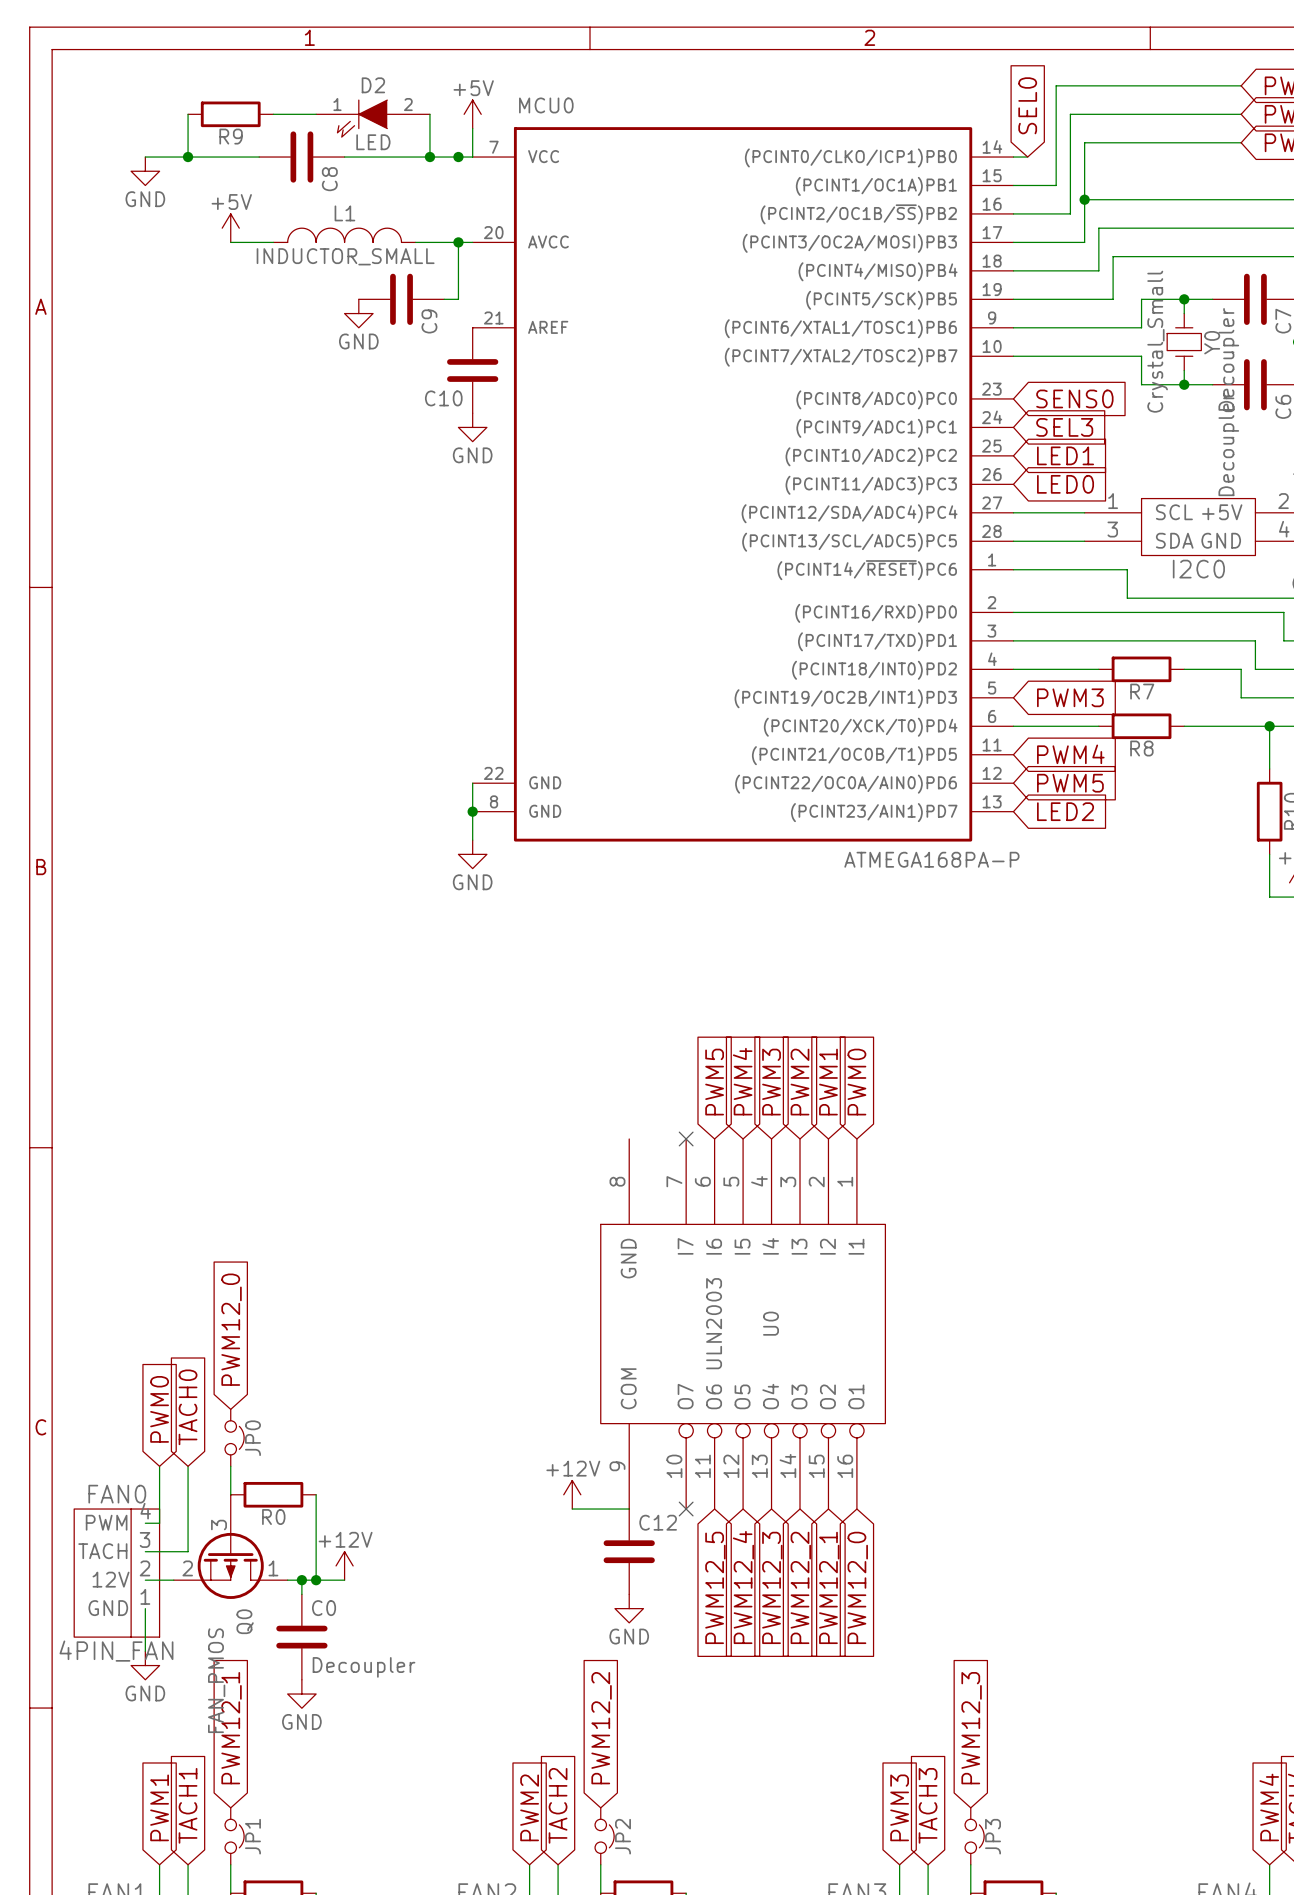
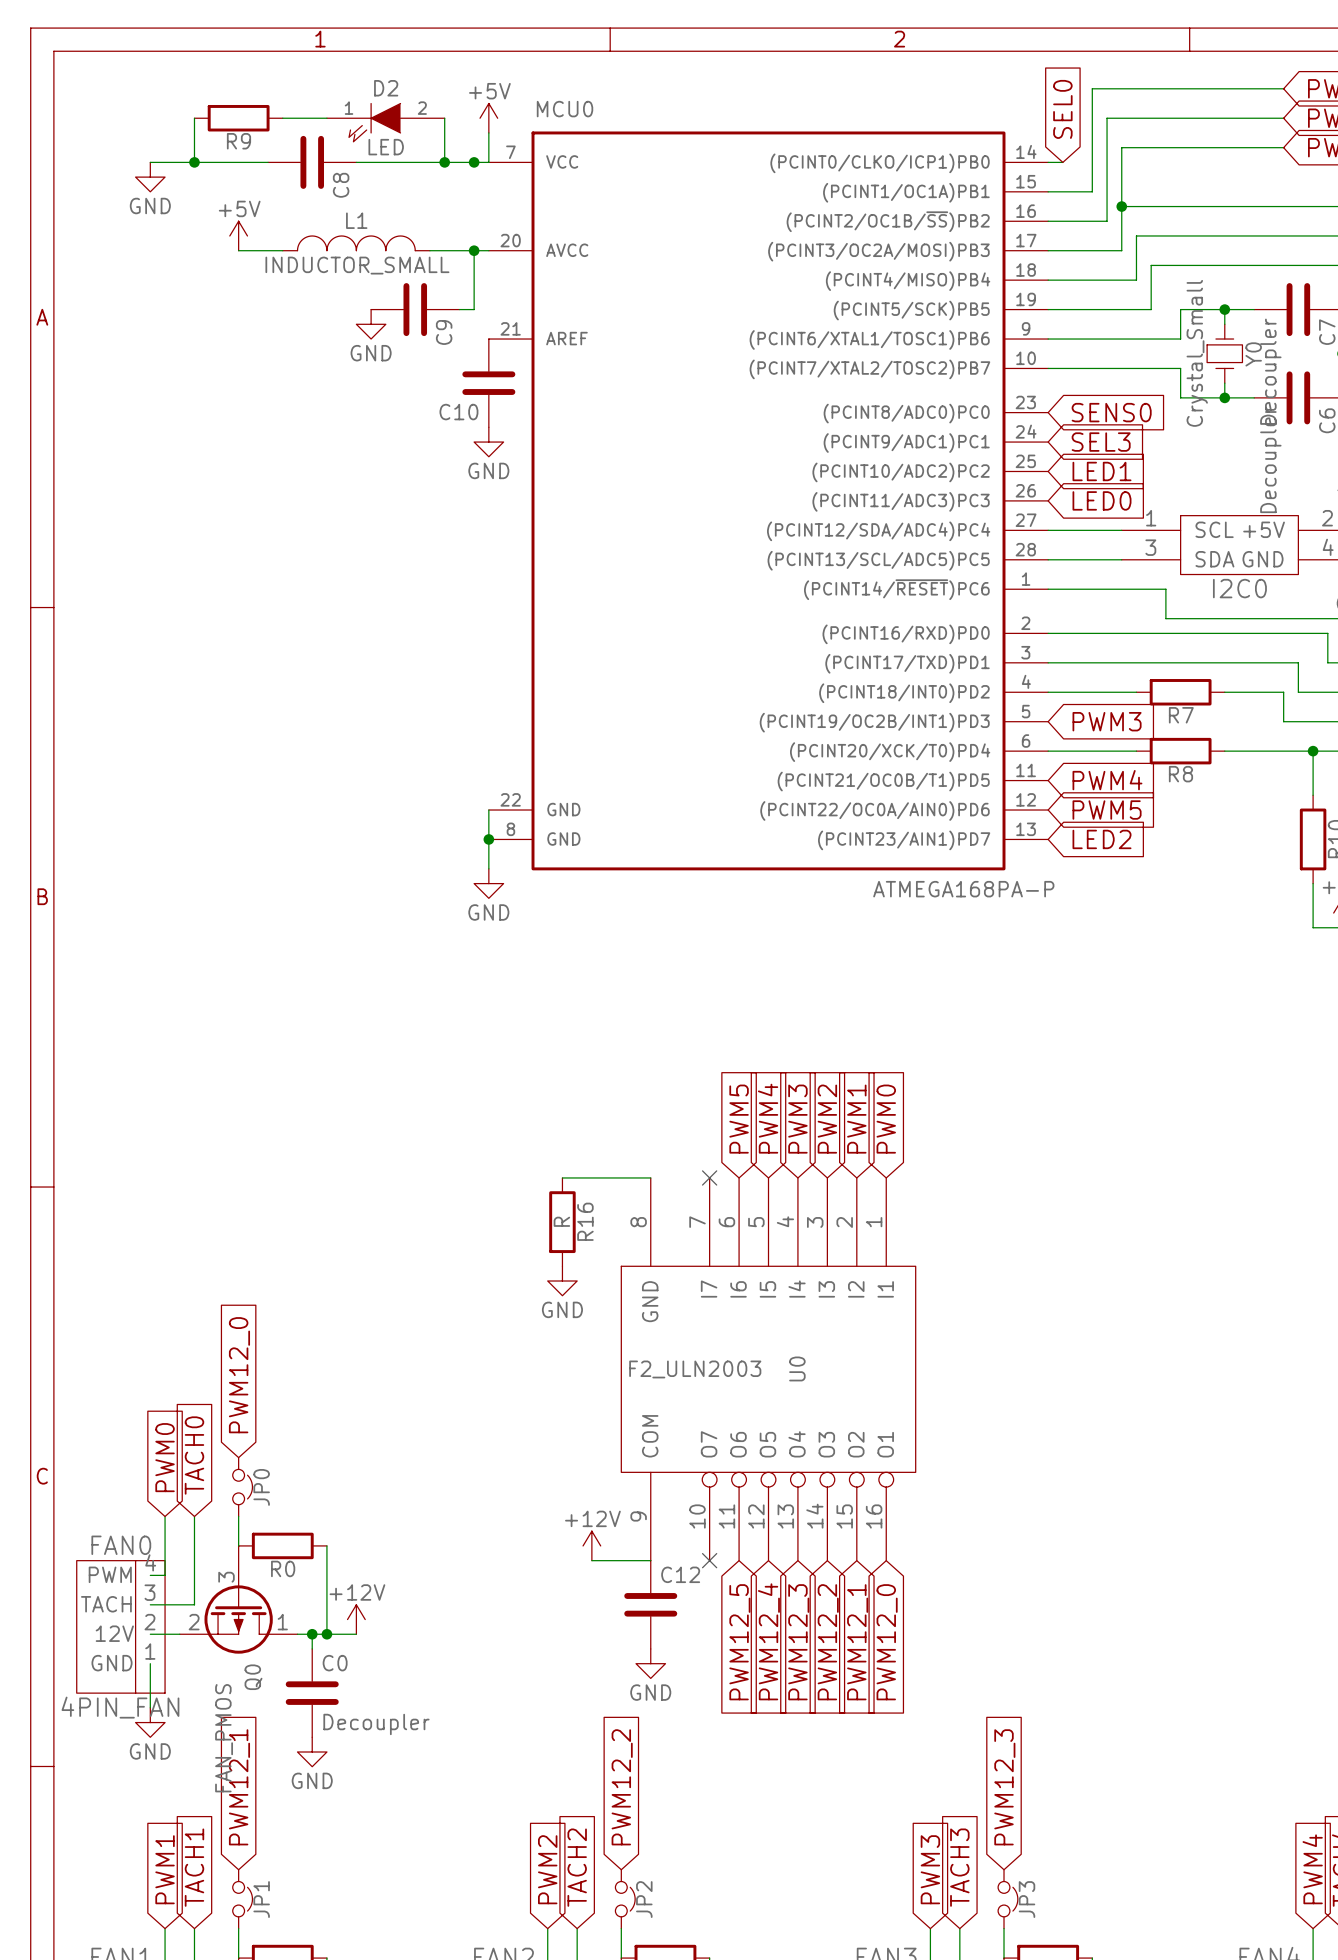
wire: none -> (562, 1177) (650, 1177)
R16: none -> R (562, 1222)
power symbol: none -> GND (562, 1281)
U0 value: ULN2003 (714, 1323) -> F2_ULN2003 (695, 1369)

